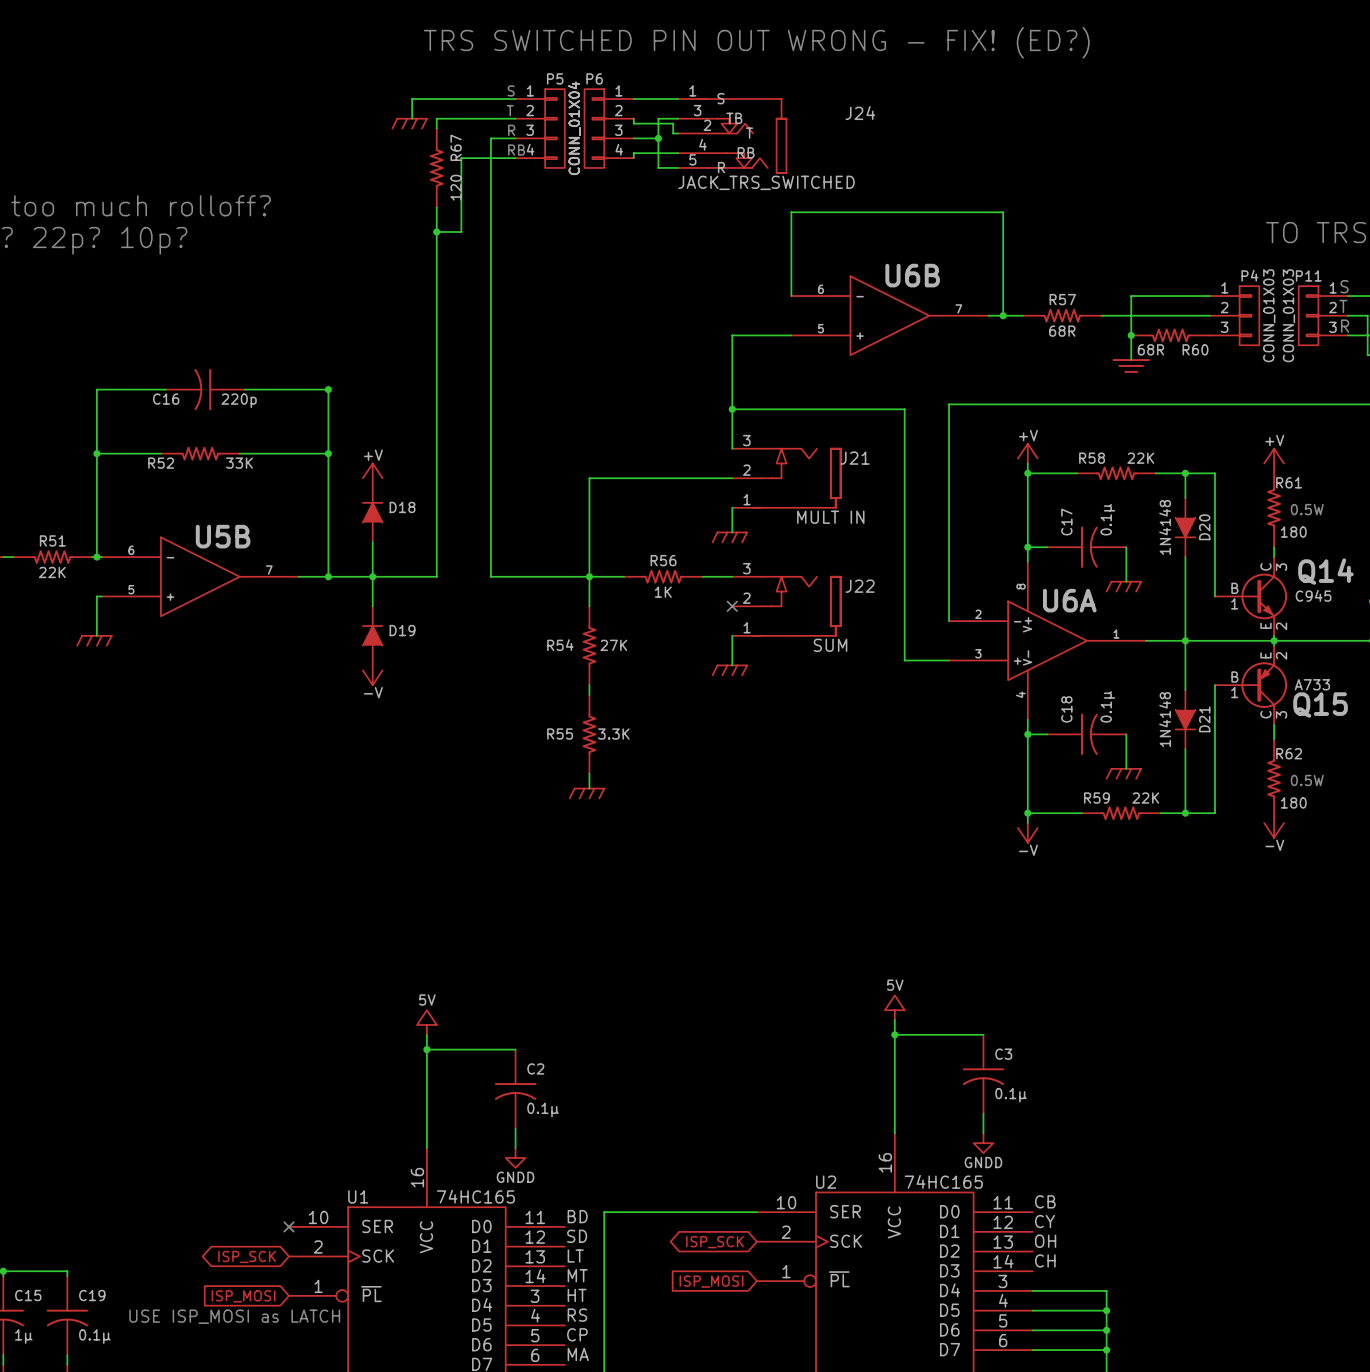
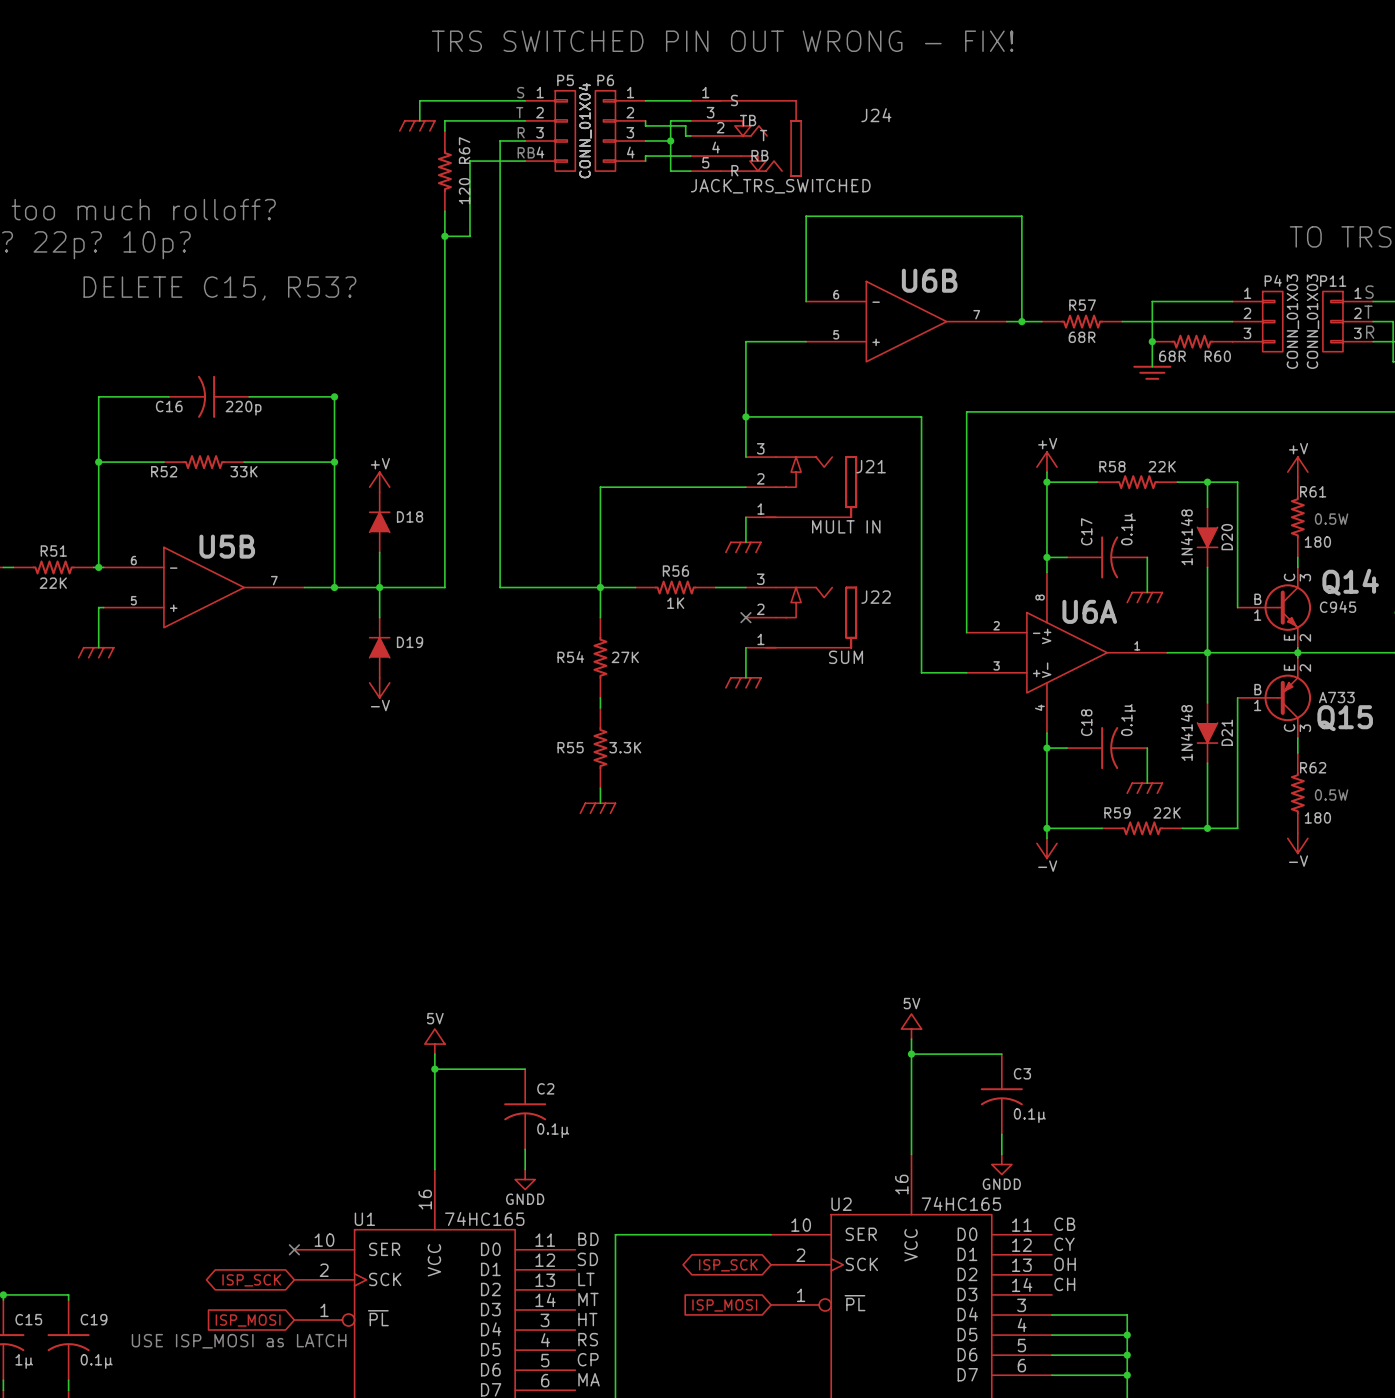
text: TRS SWITCHED PIN OUT WRONG - FIX! (ED?) (756, 42) -> TRS SWITCHED PIN OUT WRONG - FIX! (722, 41)
text: none -> DELETE C15, R53? (219, 288)

